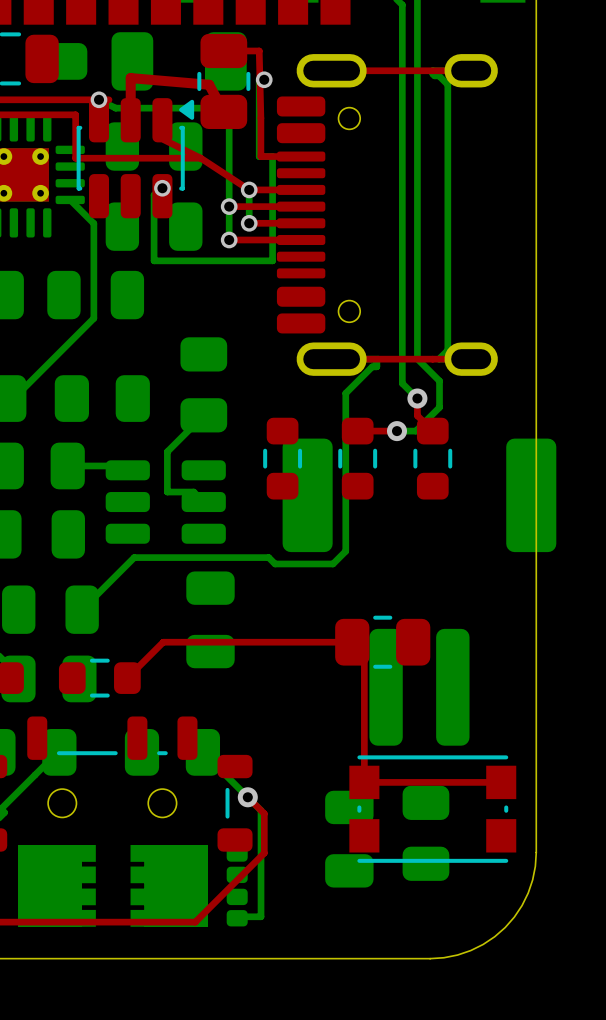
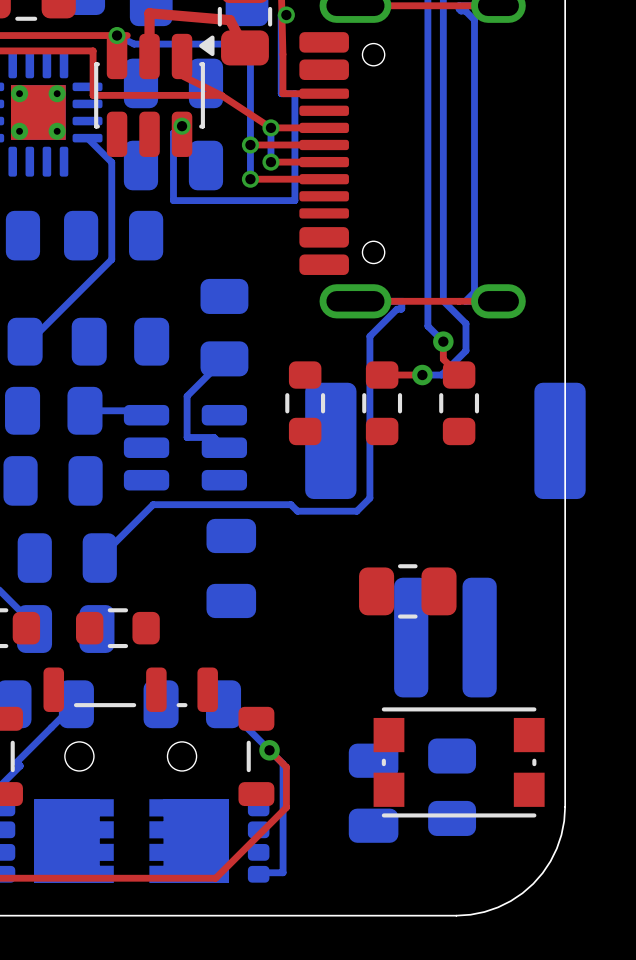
top track: (127, 678) (163, 642) (352, 642) (364, 654) (364, 782) (501, 782) -> none

